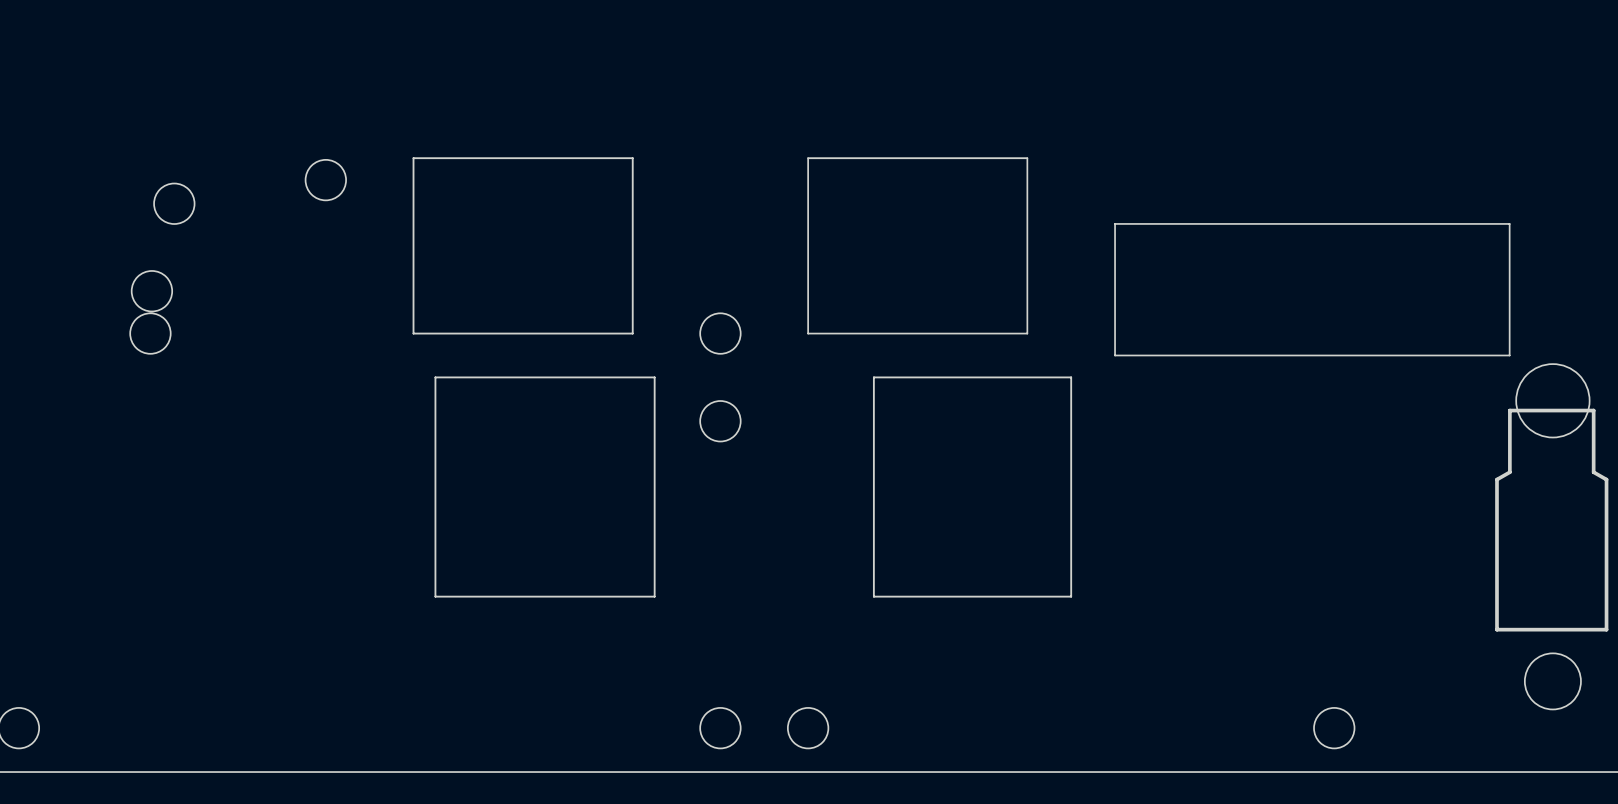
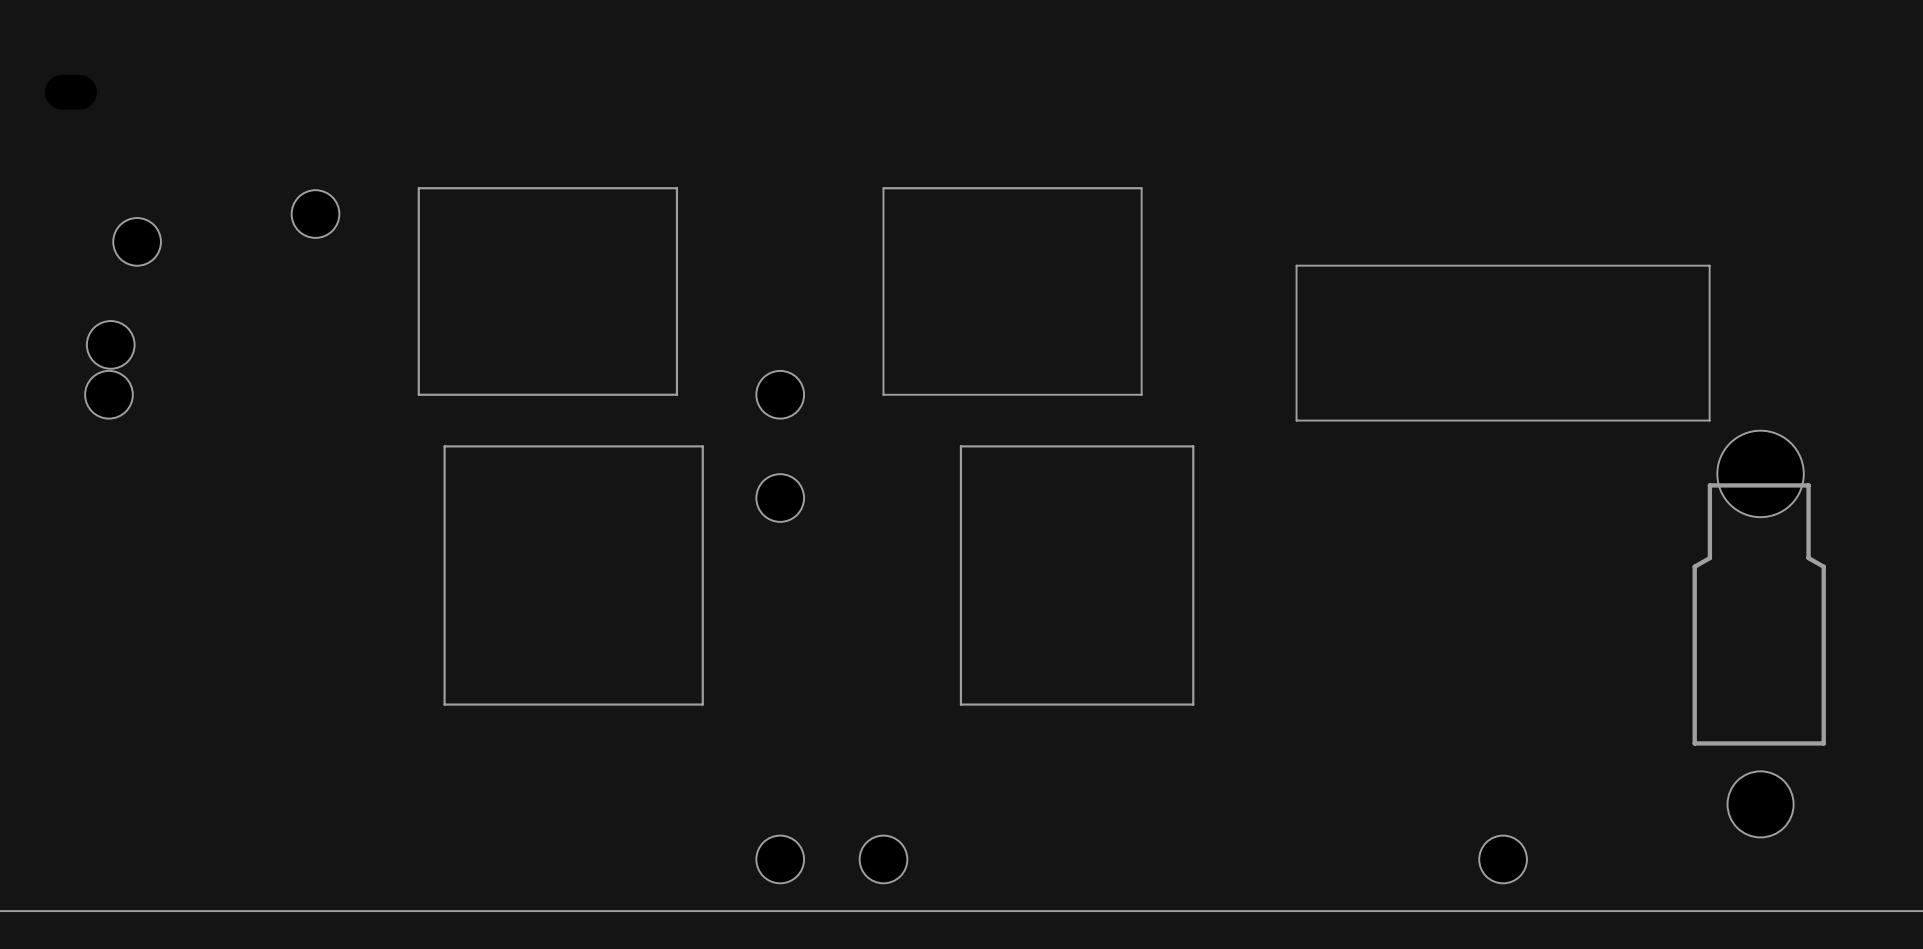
board edge: (1158, 223) (1115, 223) (1115, 355) (1158, 355) -> (1296, 265) (1296, 420)

